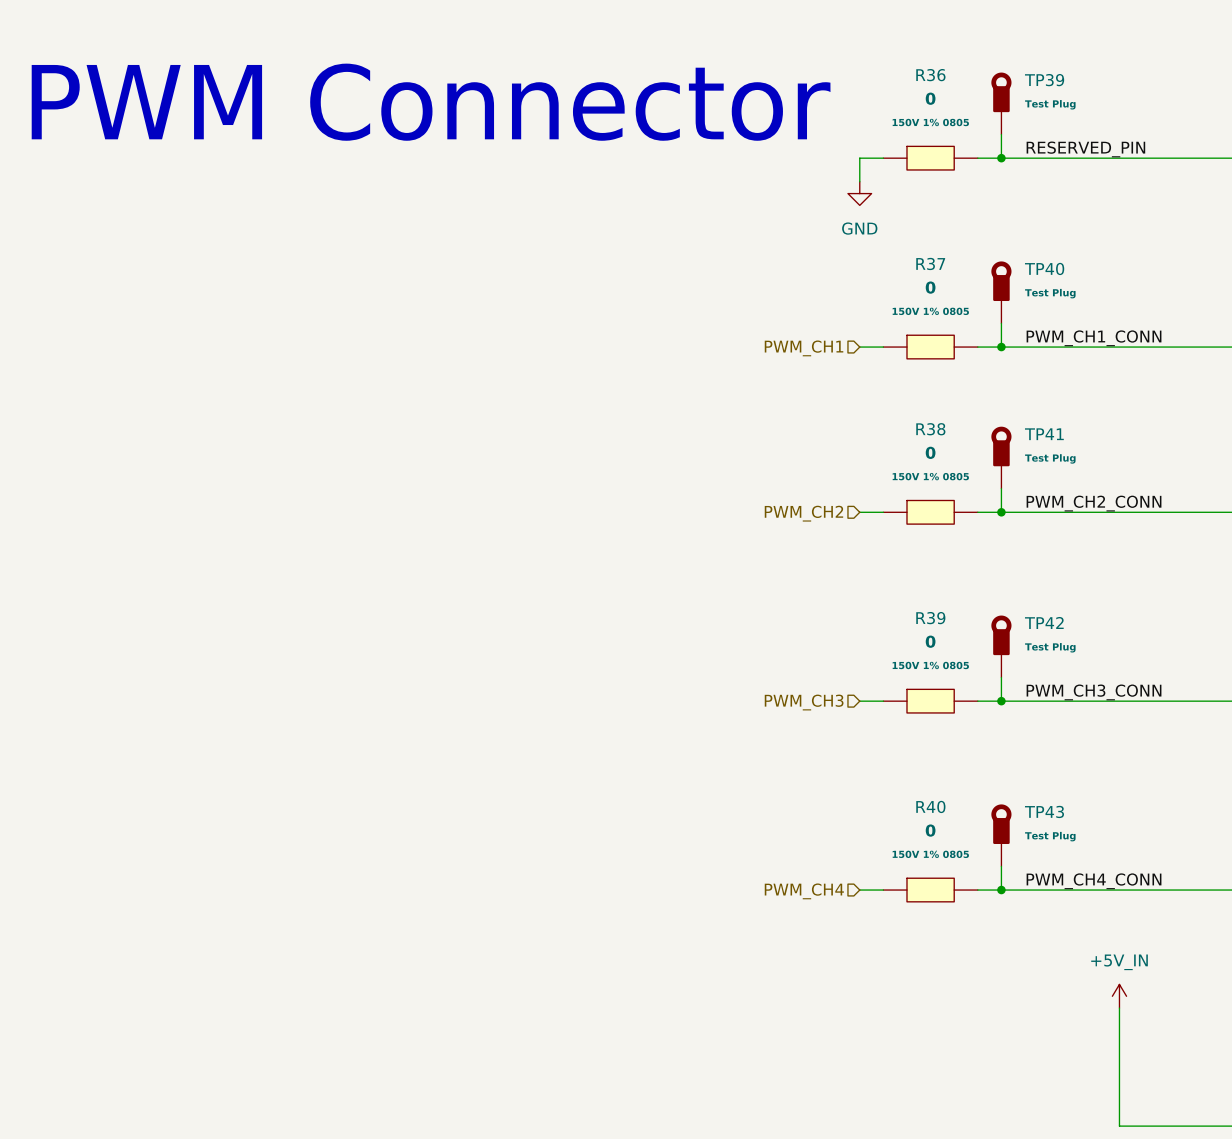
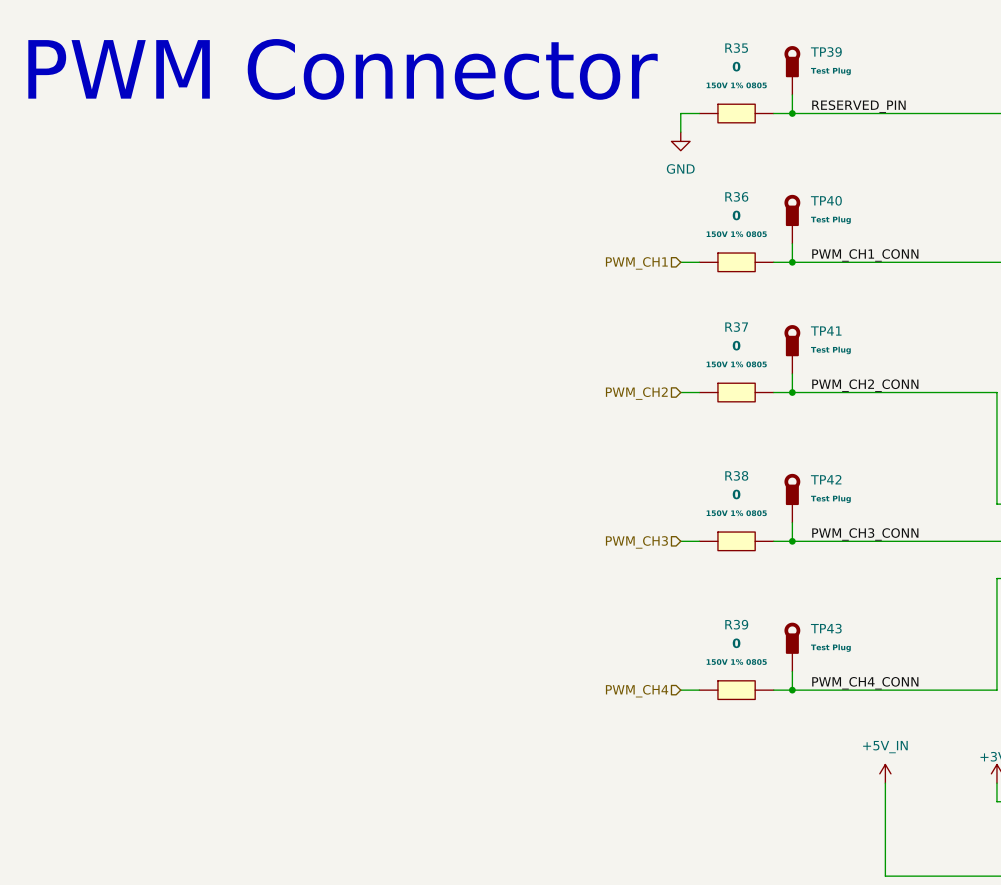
R36 name: R36 (930, 75) -> R35 (736, 48)
R37 name: R37 (930, 263) -> R36 (736, 196)
R38 name: R38 (930, 429) -> R37 (736, 327)
R39 name: R39 (930, 618) -> R38 (736, 475)
R40 name: R40 (930, 806) -> R39 (736, 624)

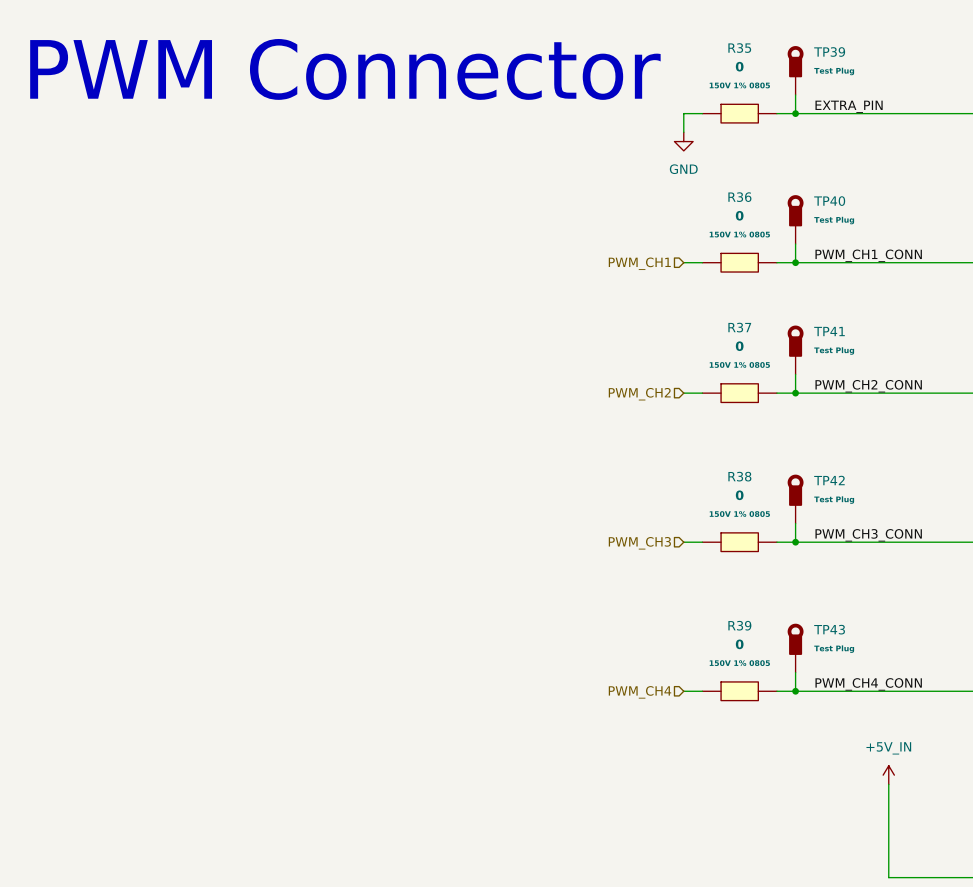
label: RESERVED_PIN (858, 106) -> EXTRA_PIN (849, 106)

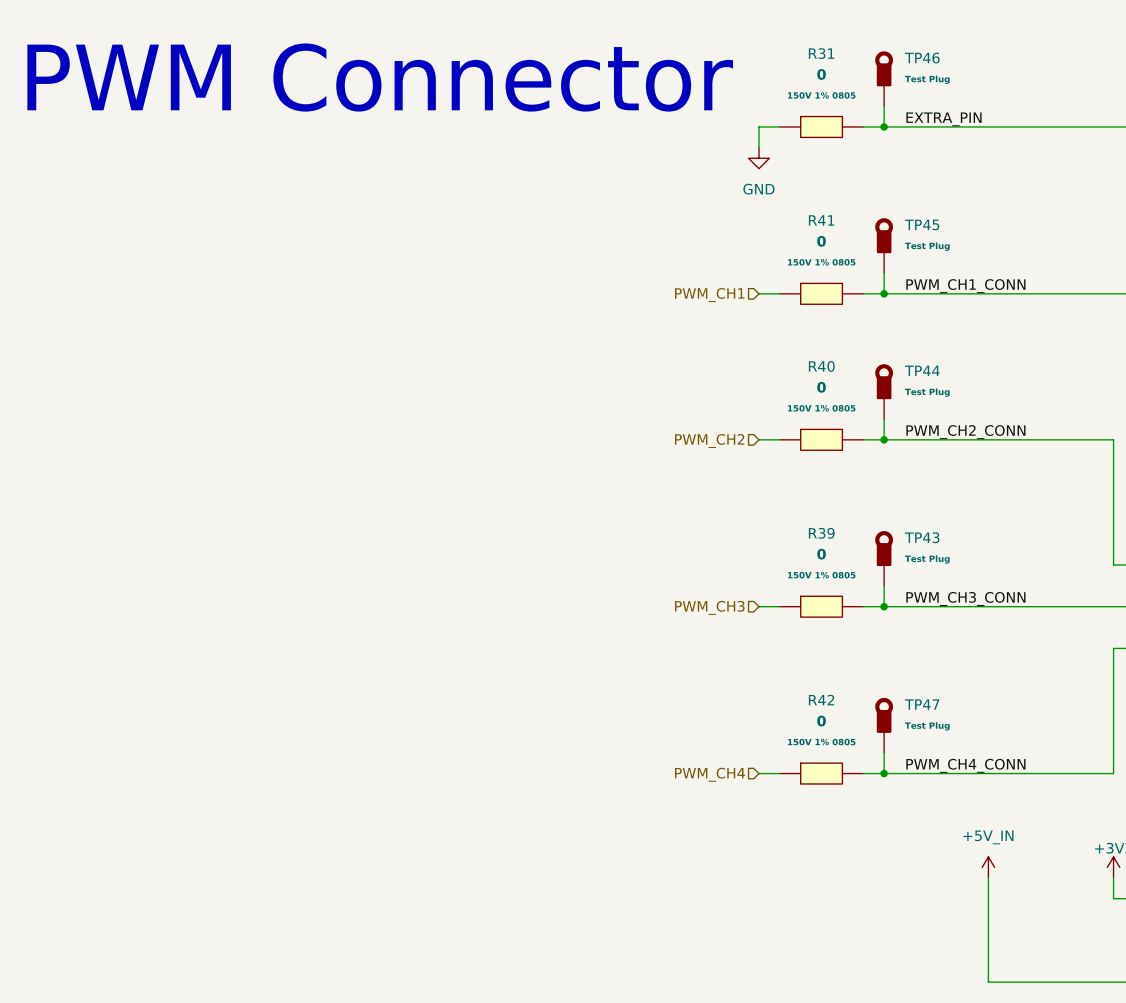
R35 name: R35 (739, 48) -> R31 (821, 53)
TP39 name: TP39 (829, 52) -> TP46 (922, 58)
R36 name: R36 (739, 197) -> R41 (821, 220)
TP40 name: TP40 (829, 201) -> TP45 (922, 224)
R37 name: R37 (739, 327) -> R40 (821, 366)
TP41 name: TP41 (829, 331) -> TP44 (922, 370)
R38 name: R38 (739, 476) -> R39 (821, 533)
TP42 name: TP42 (829, 480) -> TP43 (922, 537)
R39 name: R39 (739, 625) -> R42 (821, 700)
TP43 name: TP43 (829, 629) -> TP47 (922, 704)

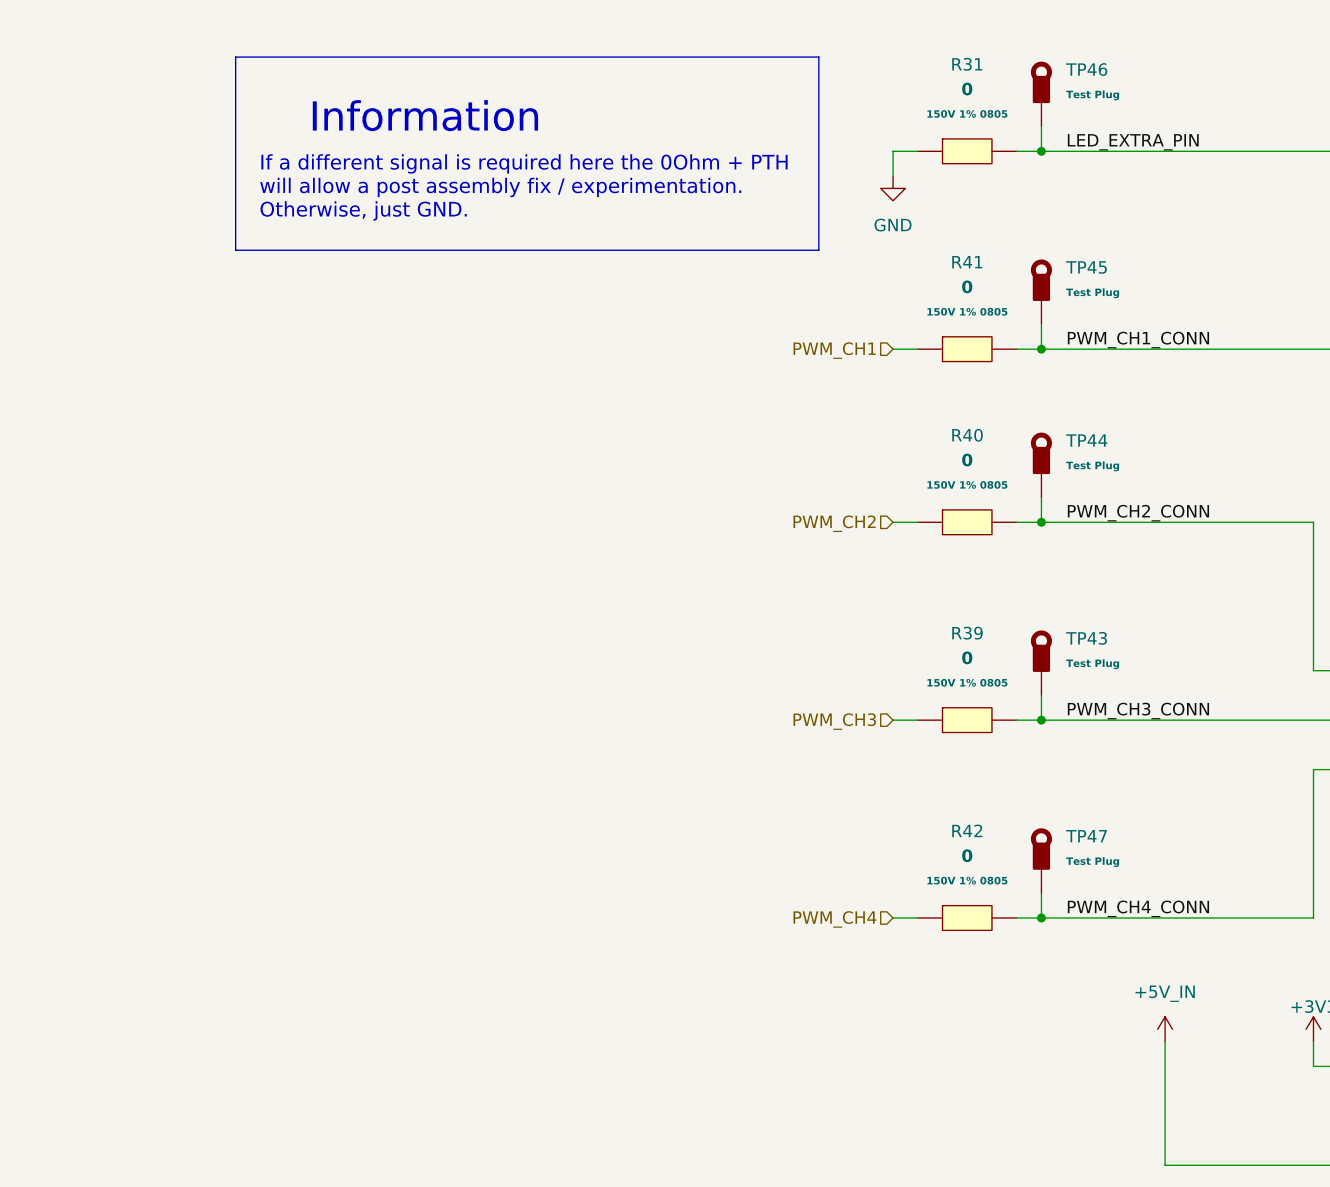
line: none -> (235, 57) (818, 57) (818, 250) (235, 250) (235, 57)
text: PWM Connector (380, 77) -> none
text: none -> Information (425, 115)
label: EXTRA_PIN (943, 119) -> LED_EXTRA_PIN (1133, 142)
text: none -> If a different signal is required here the 0Ohm + PTH (524, 163)
text: none -> will allow a post assembly fix / experimentation. (500, 187)
text: none -> Otherwise, just GND. (363, 210)

